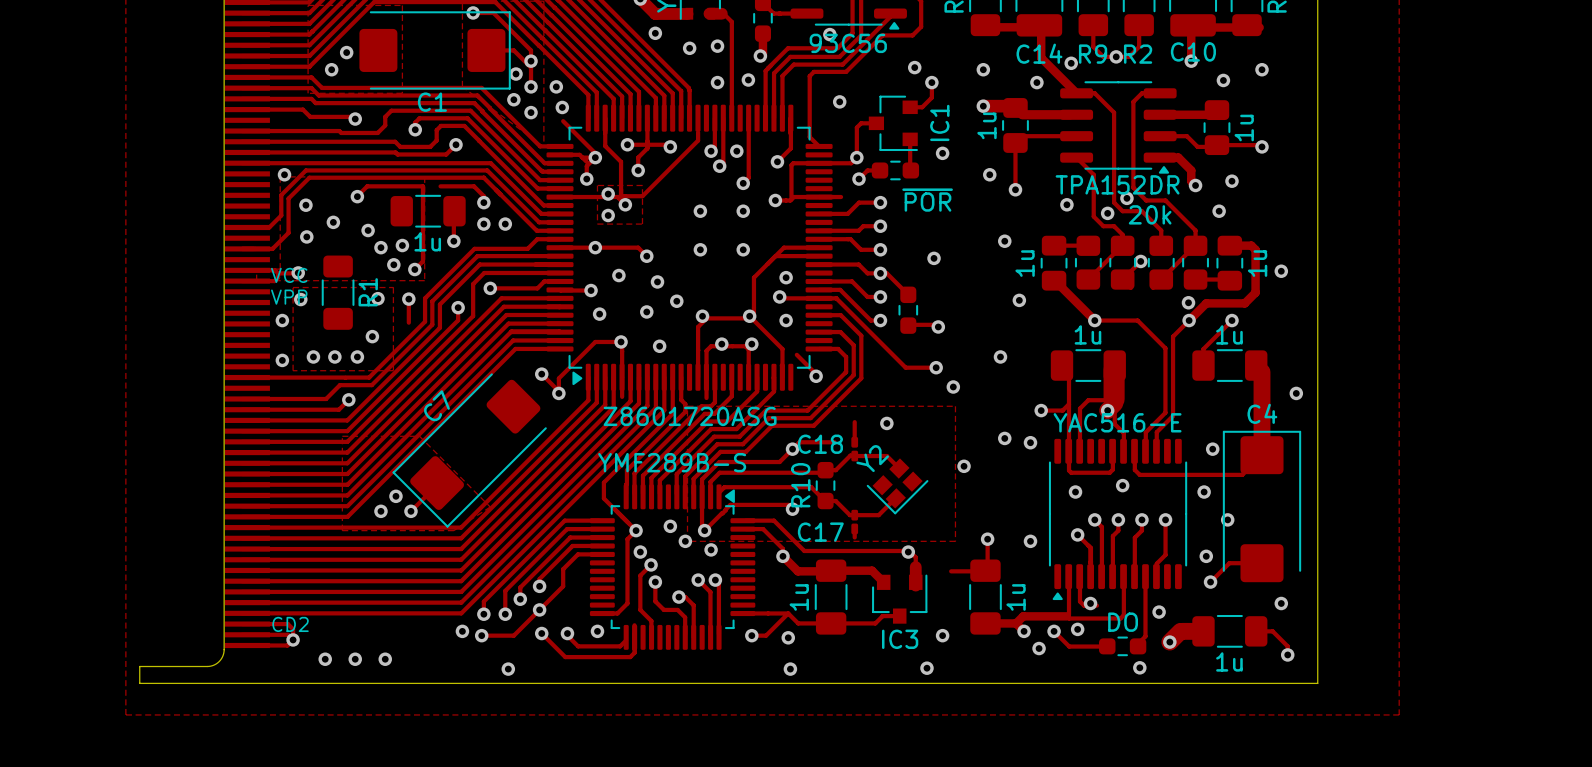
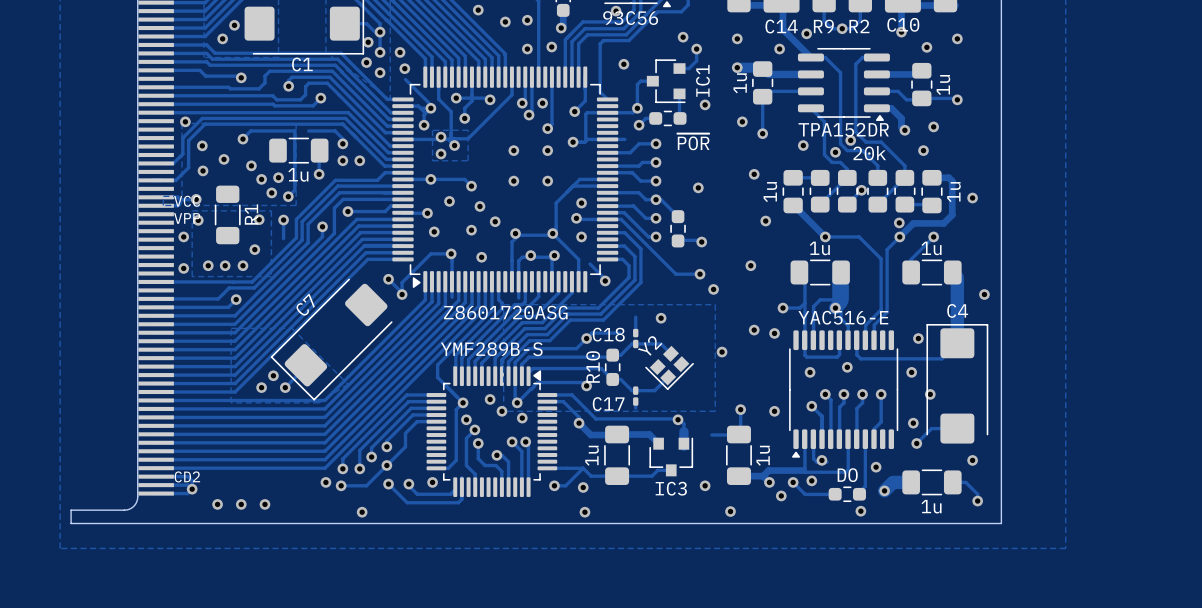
via position: (926, 668) -> (730, 511)

